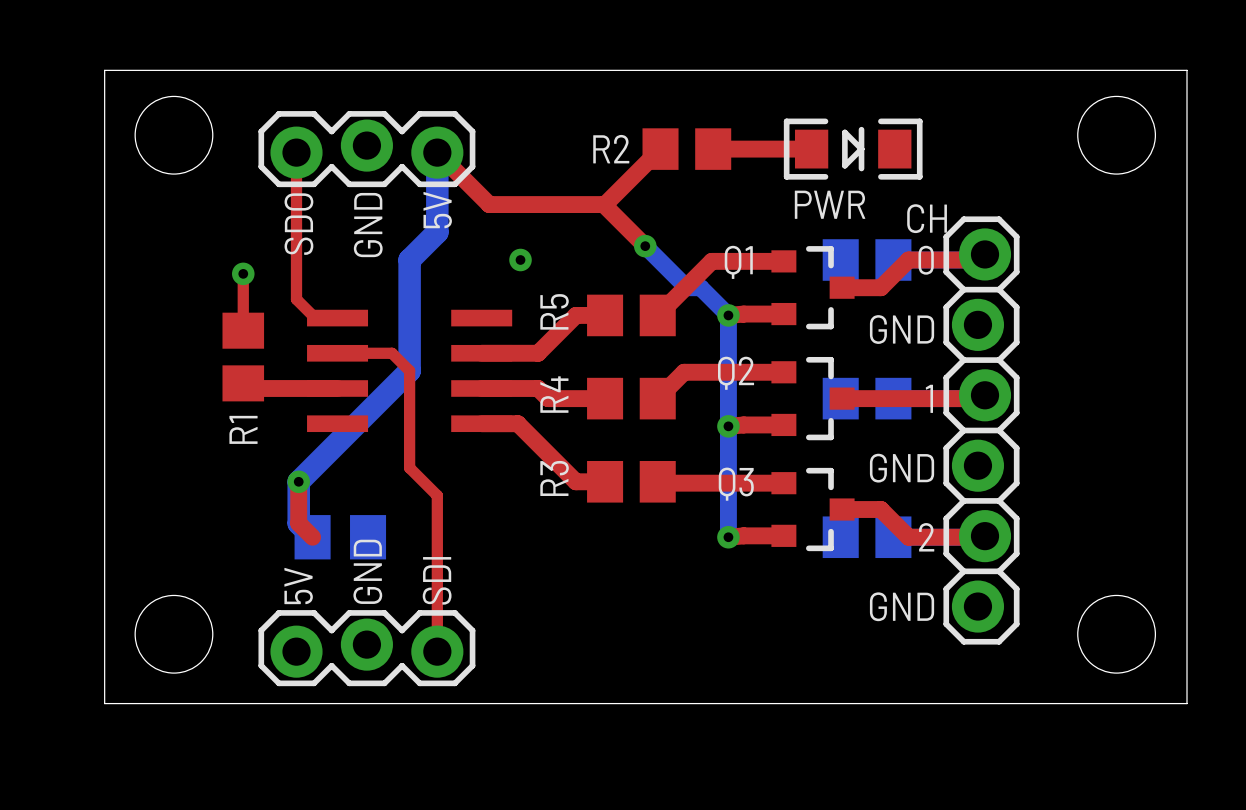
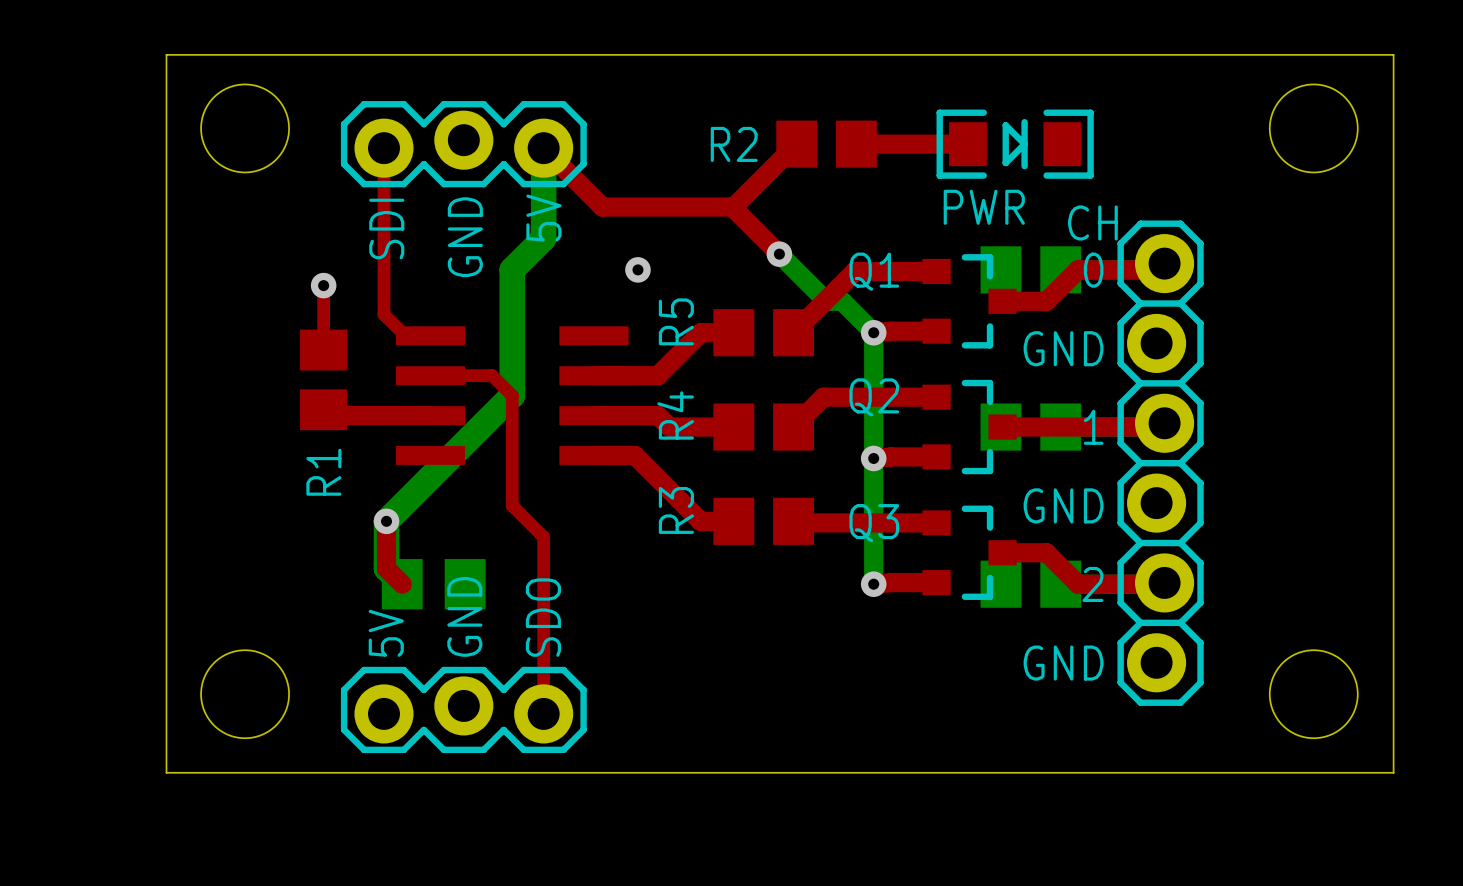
text: SDO (298, 224) -> SDI (386, 228)
text: SDI (437, 580) -> SDO (543, 617)

